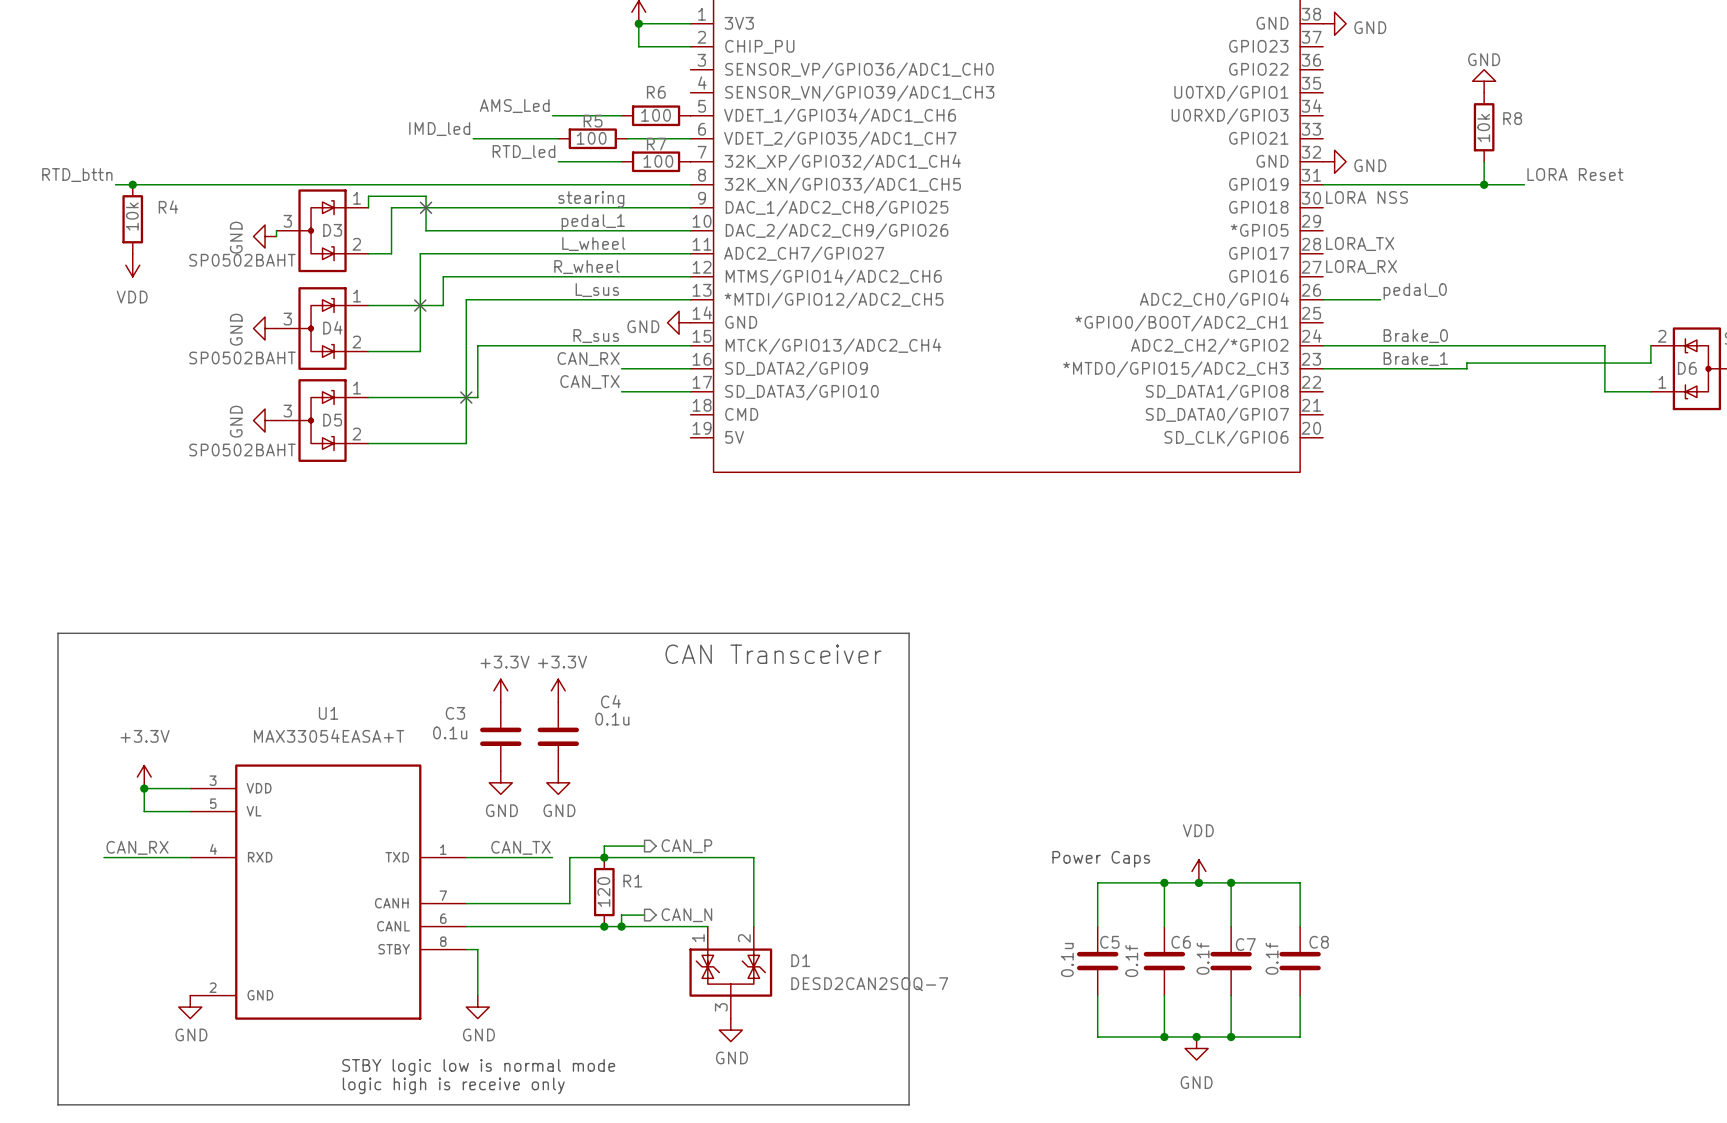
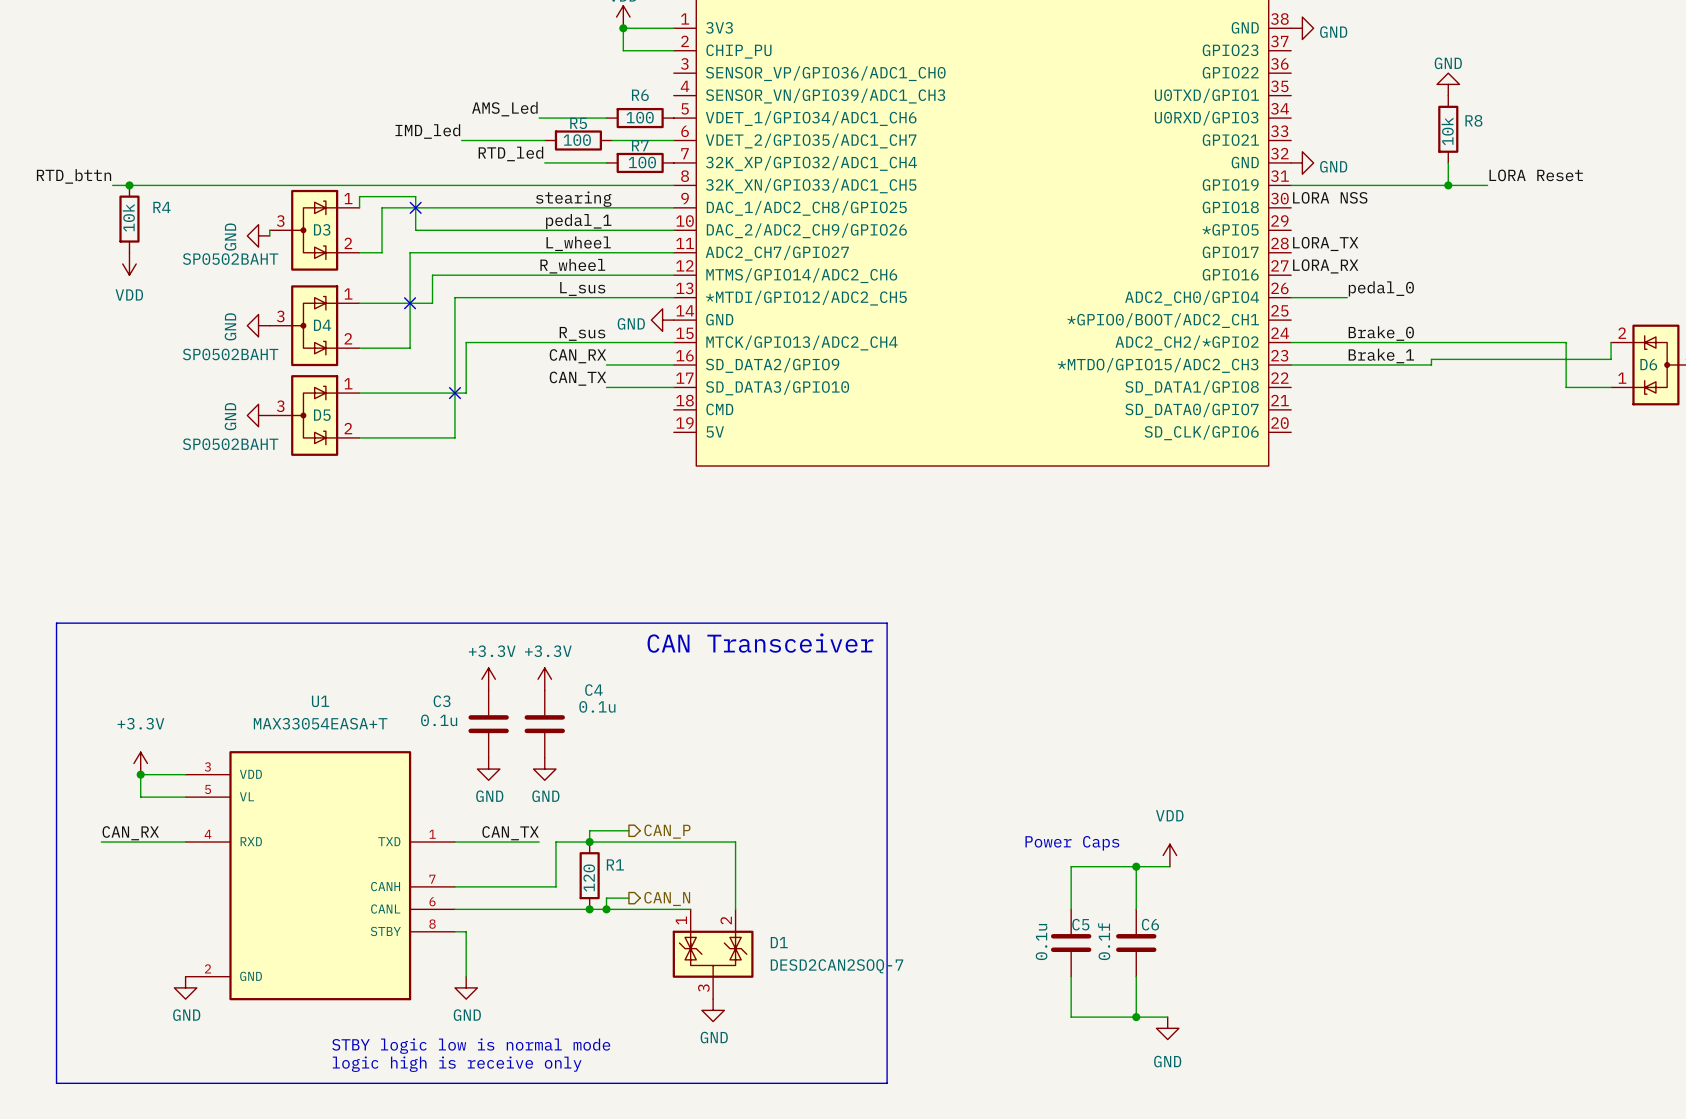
wire: (1198, 882) (1300, 882) (1300, 926) -> none
junction: (1198, 882) -> none
wire: (1231, 882) (1231, 926) -> none
junction: (1231, 882) -> none
C7: 0.1f (1231, 961) -> none
C8: 0.1f (1300, 961) -> none
wire: (1231, 995) (1231, 1036) -> none
wire: (1300, 995) (1300, 1036) (1196, 1036) -> none
junction: (1196, 1036) -> none
junction: (1231, 1036) -> none

